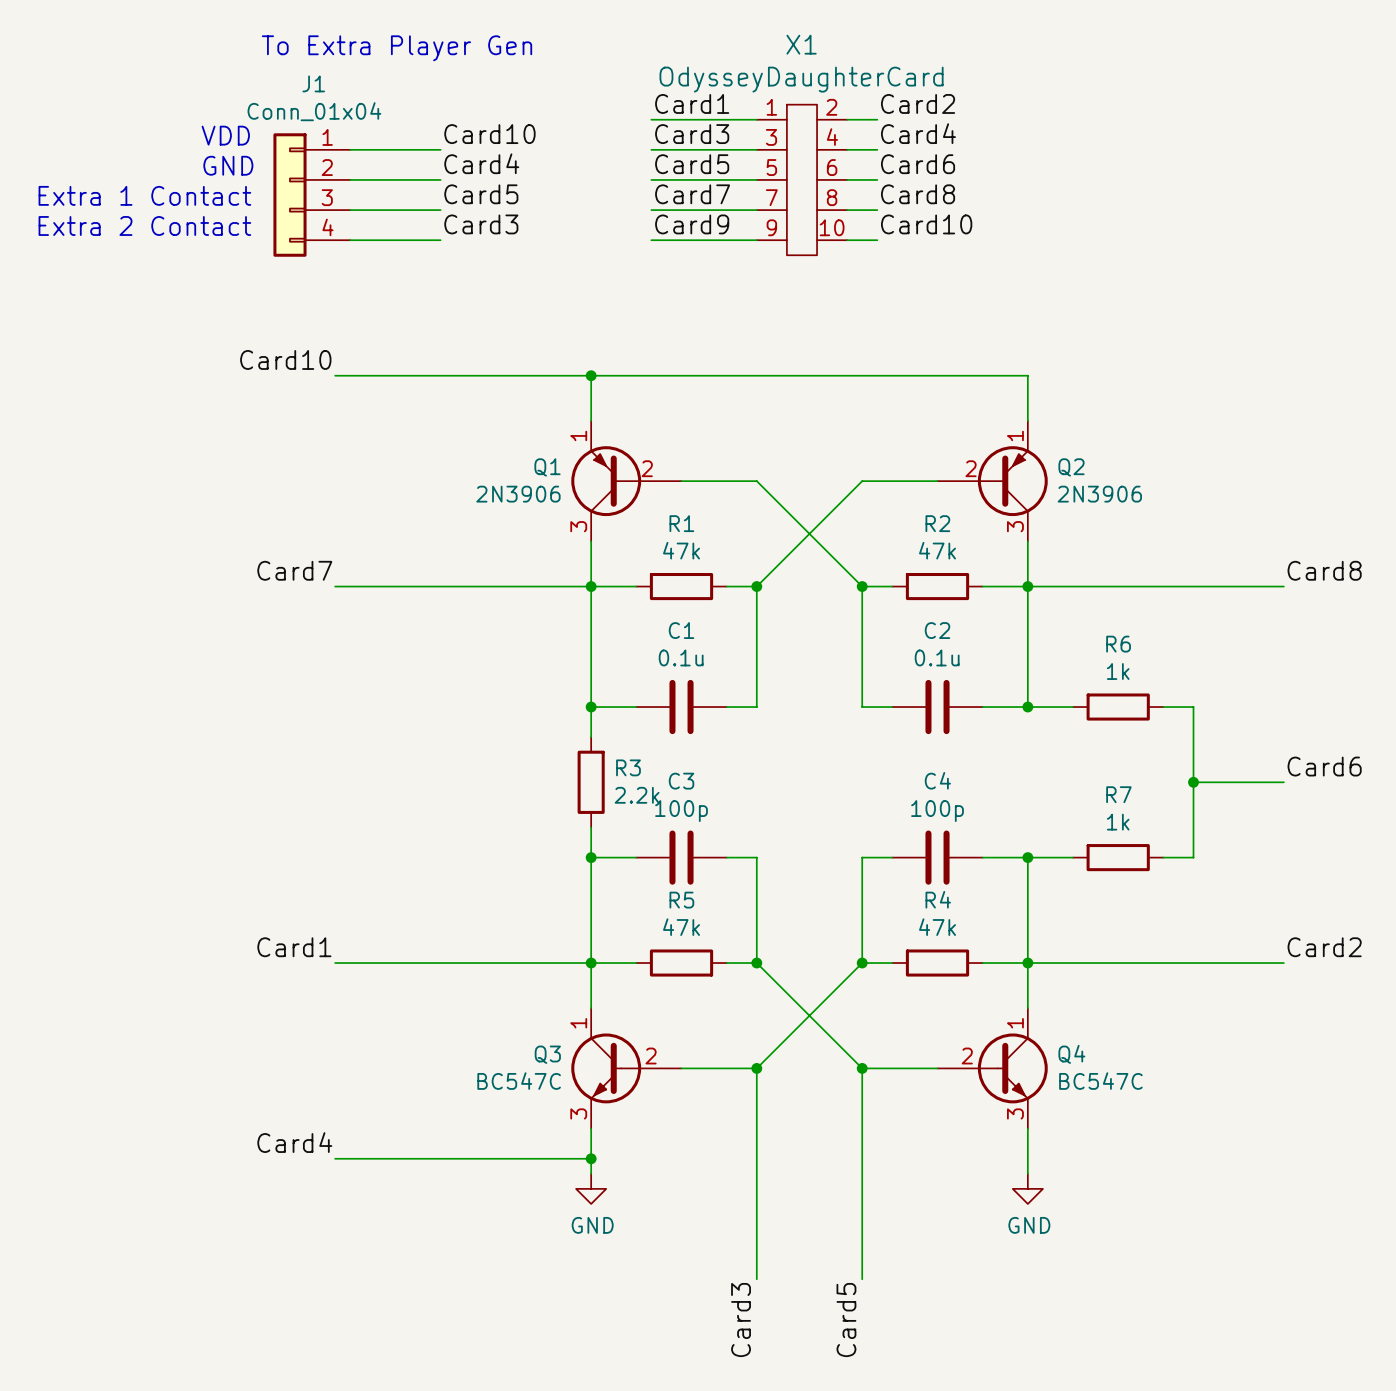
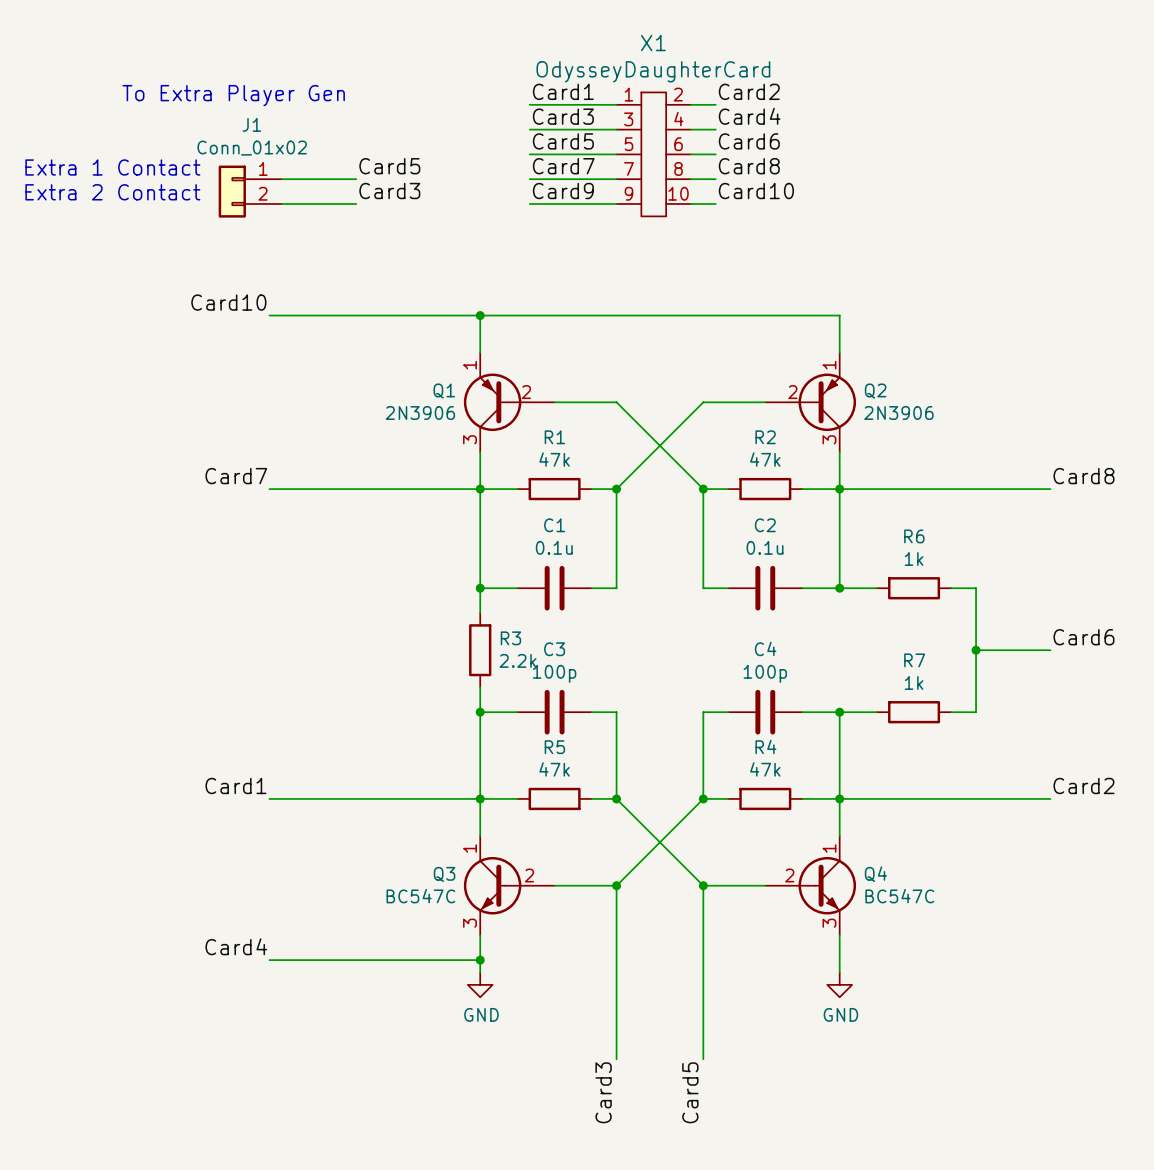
text position: To Extra Player Gen (397, 48) -> To Extra Player Gen (233, 95)
J1 name position: J1 (313, 83) -> J1 (251, 124)
J1 value: Conn_01x04 (314, 111) -> Conn_01x02 (252, 148)
J1 symbol: [273, 133, 351, 257] -> [218, 165, 282, 218]
label: Card10 (489, 134) -> none
text: VDD (225, 135) -> none
wire: (350, 149) (440, 149) -> none
label: Card4 (481, 163) -> none
text: GND (228, 165) -> none
wire: (350, 179) (440, 179) -> none

